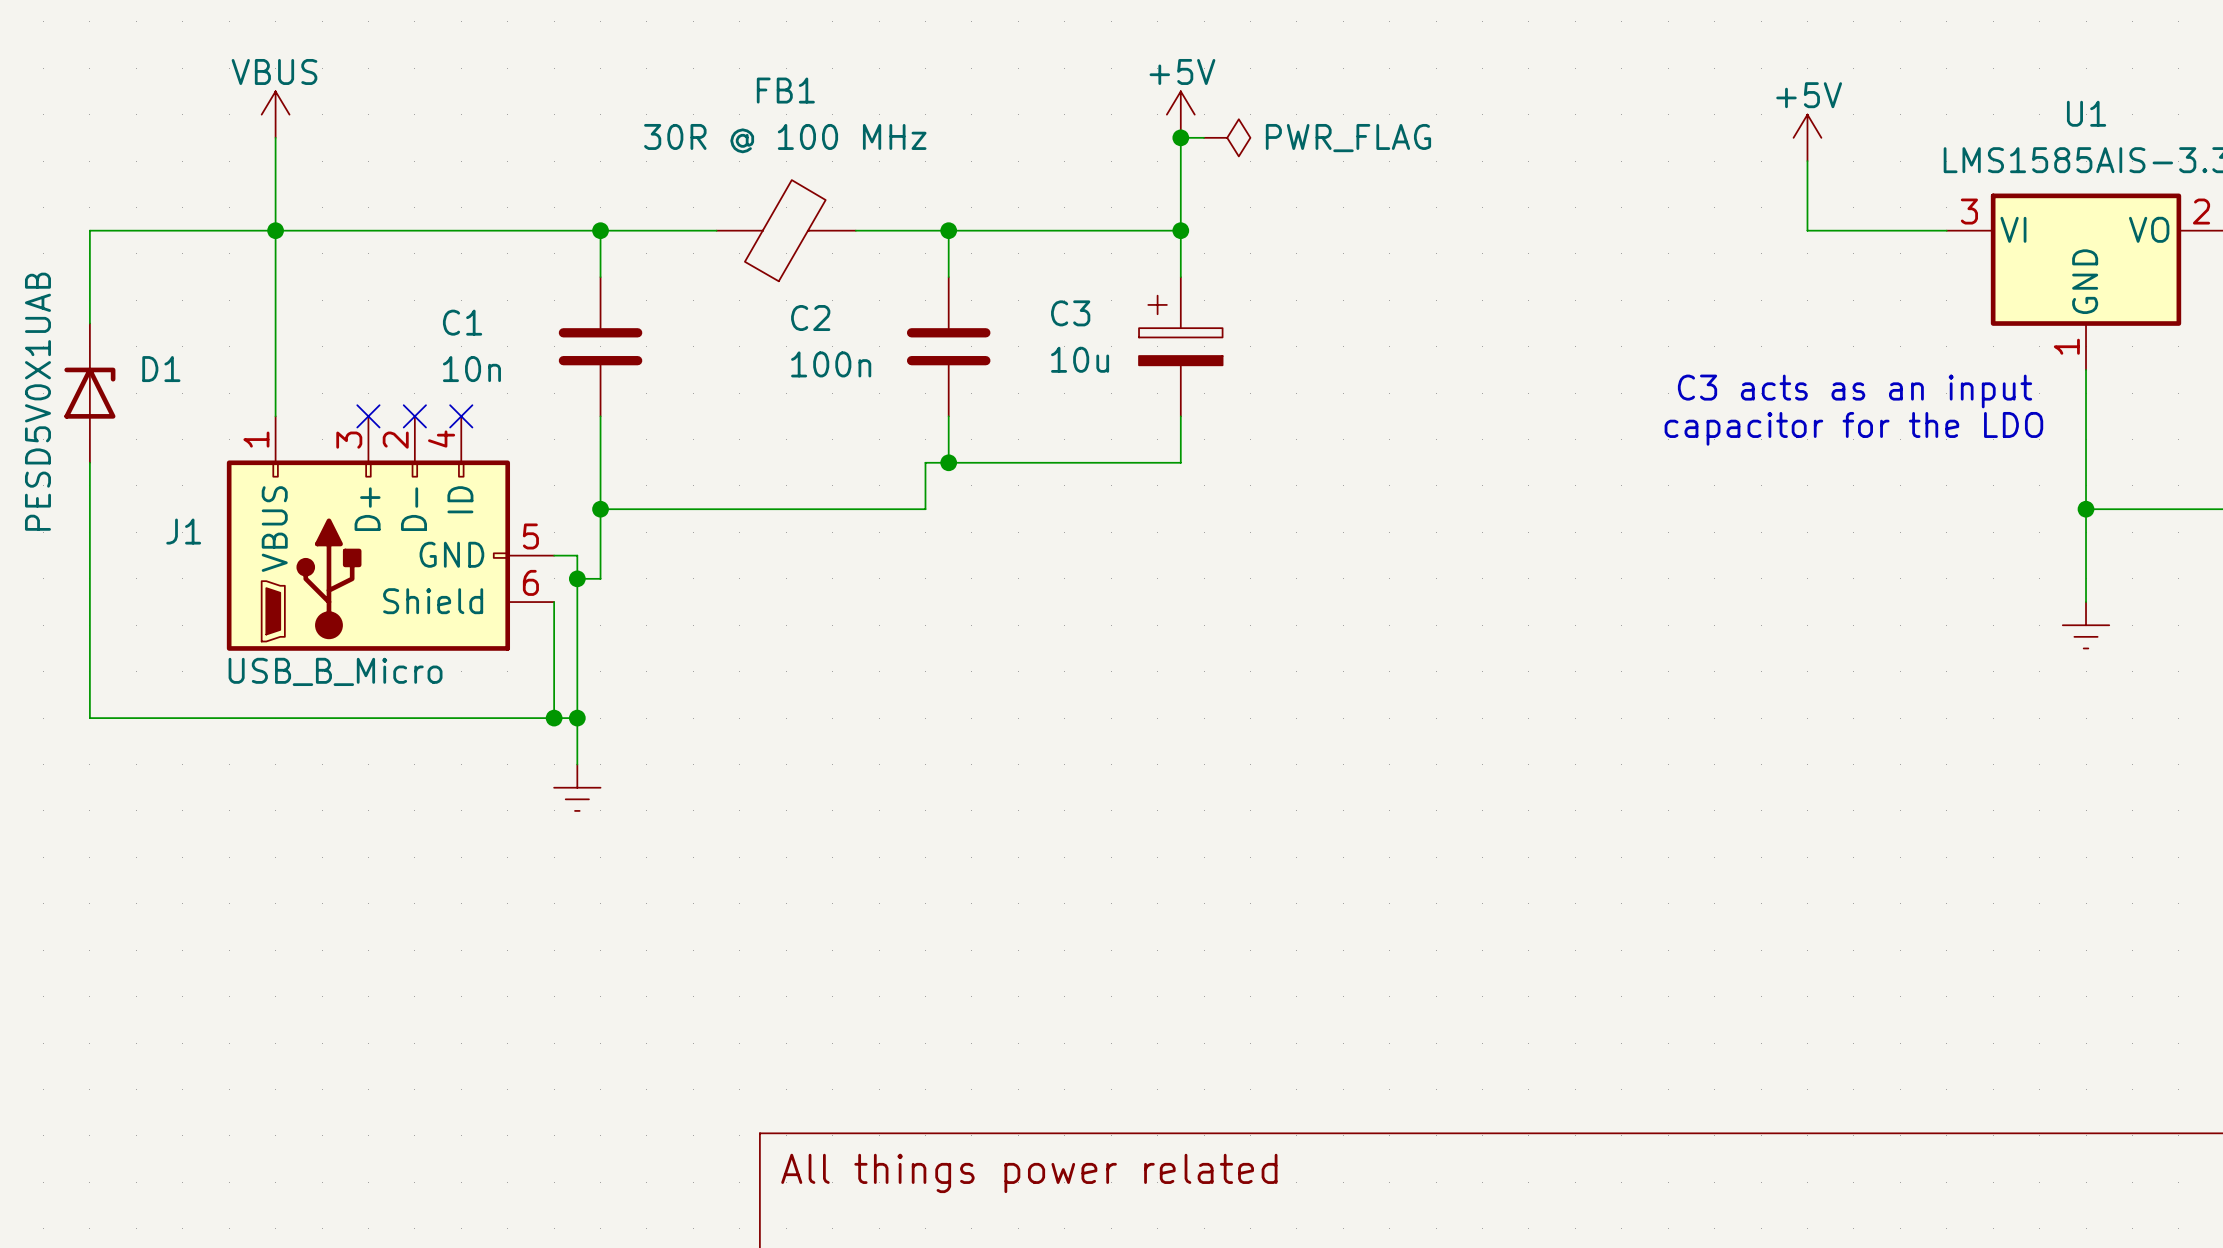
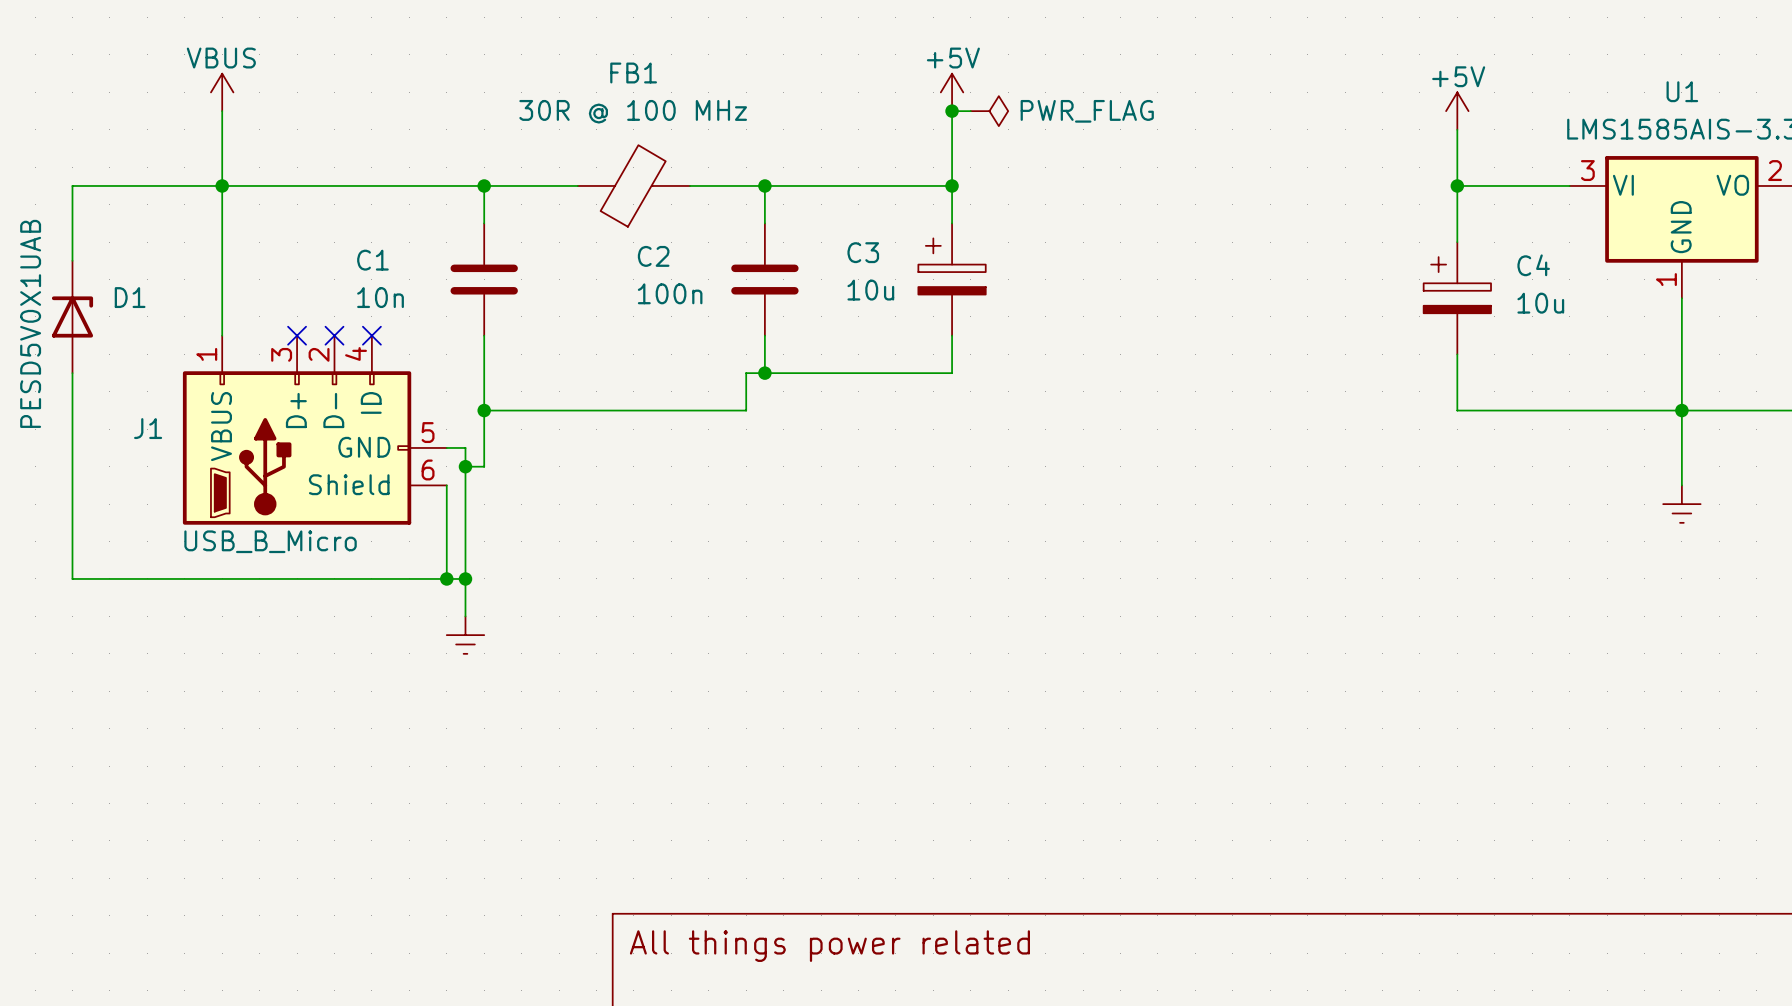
wire: none -> (1457, 185) (1457, 242)
junction: none -> (1457, 185)
C4: none -> 10u (1457, 298)
text: C3 acts as an input (1855, 391) -> none
text: capacitor for the LDO (1853, 428) -> none
wire: none -> (1457, 354) (1457, 410) (1681, 410)

